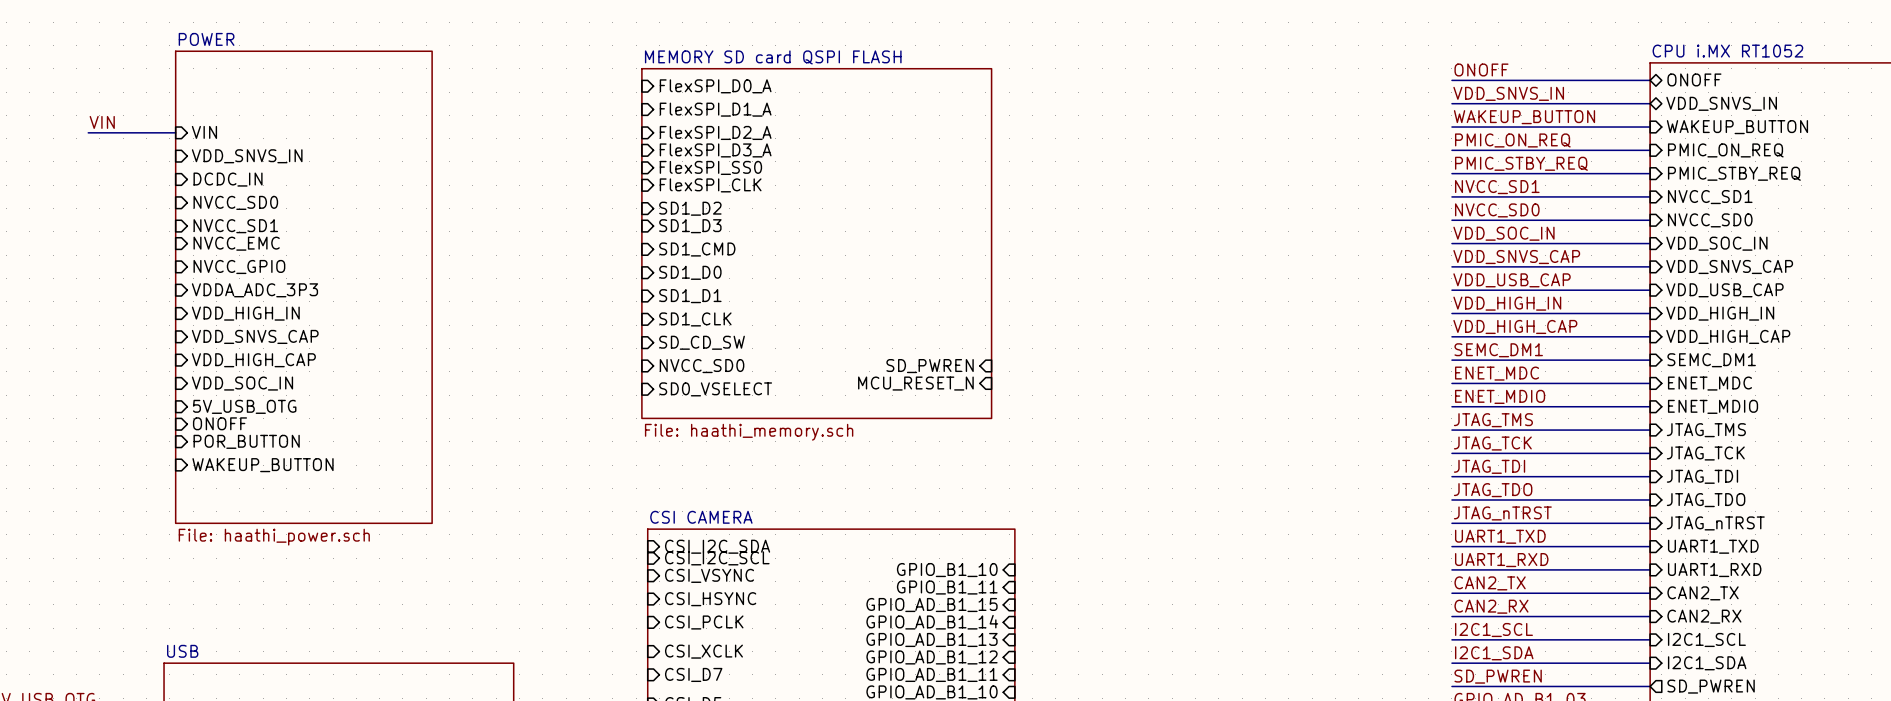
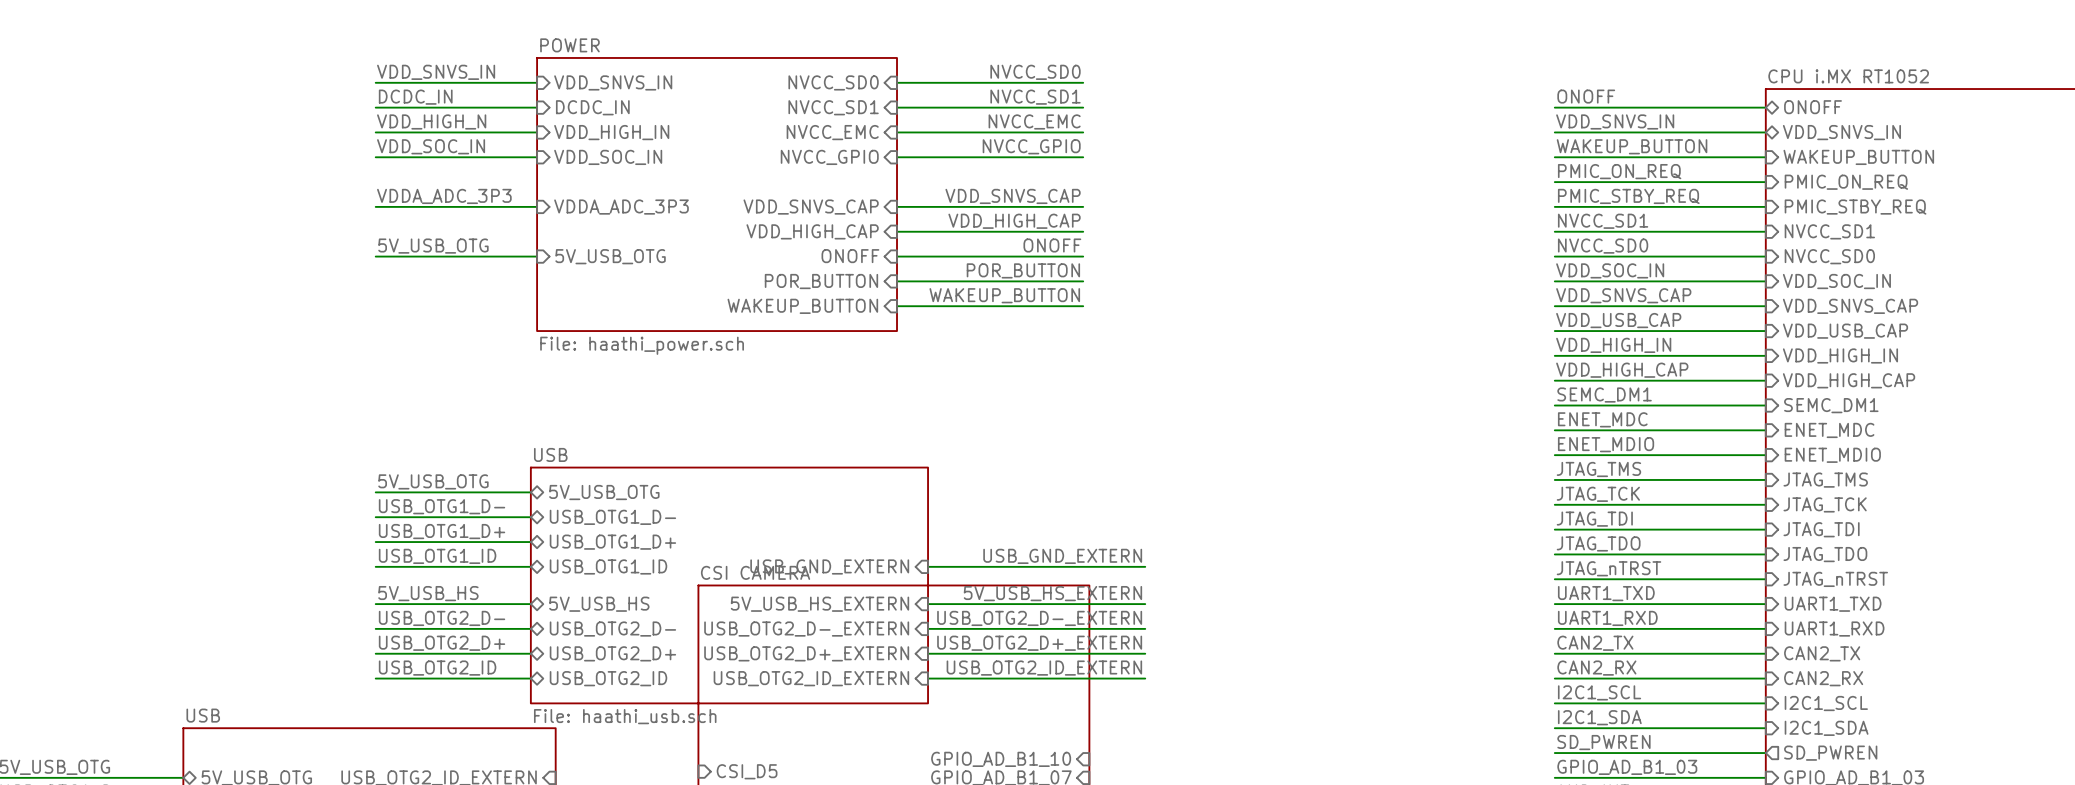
label: none -> VDD_SNVS_IN (436, 72)
label: none -> NVCC_SD0 (1035, 72)
wire: none -> (375, 82) (537, 82)
sheet pin: none -> VDD_SNVS_IN (613, 82)
sheet pin: none -> NVCC_SD0 (833, 82)
wire: none -> (897, 82) (1083, 82)
label: none -> DCDC_IN (415, 97)
label: none -> NVCC_SD1 (1035, 97)
wire: none -> (375, 107) (537, 107)
sheet pin: none -> DCDC_IN (592, 107)
sheet pin: none -> NVCC_SD1 (833, 107)
wire: none -> (897, 107) (1083, 107)
sheet pin: FlexSPI_D0_A (715, 86) -> none
label: none -> VDD_HIGH_N (431, 121)
label: none -> NVCC_EMC (1034, 121)
wire: none -> (375, 132) (537, 132)
sheet pin: none -> VDD_HIGH_IN (611, 132)
sheet pin: none -> NVCC_EMC (832, 132)
wire: none -> (897, 132) (1083, 132)
sheet pin: FlexSPI_D1_A (715, 109) -> none
label: none -> VDD_SOC_IN (431, 146)
label: none -> NVCC_GPIO (1031, 146)
label: VIN (102, 122) -> none
wire: none -> (375, 157) (537, 157)
sheet pin: none -> VDD_SOC_IN (608, 157)
sheet pin: none -> NVCC_GPIO (829, 157)
wire: none -> (897, 157) (1083, 157)
wire: (88, 132) (175, 132) -> none
sheet pin: VIN (204, 132) -> none
sheet pin: FlexSPI_D2_A (715, 132) -> none
sheet pin: FlexSPI_D3_A (715, 150) -> none
sheet pin: VDD_SNVS_IN (247, 156) -> none
sheet POWER: none -> File: haathi_power.sch (717, 194)
label: none -> VDDA_ADC_3P3 (444, 196)
label: none -> VDD_SNVS_CAP (1013, 196)
sheet pin: FlexSPI_SS0 (710, 167) -> none
wire: none -> (375, 206) (537, 206)
sheet pin: none -> VDDA_ADC_3P3 (621, 207)
sheet pin: none -> VDD_SNVS_CAP (811, 207)
wire: none -> (897, 206) (1083, 206)
sheet pin: DCDC_IN (228, 179) -> none
sheet pin: FlexSPI_CLK (710, 185) -> none
label: none -> VDD_HIGH_CAP (1014, 221)
wire: none -> (897, 231) (1083, 231)
sheet pin: none -> VDD_HIGH_CAP (812, 231)
sheet pin: NVCC_SD0 (235, 202) -> none
sheet pin: SD1_D2 (690, 208) -> none
label: none -> ONOFF (1052, 245)
label: none -> 5V_USB_OTG (433, 246)
sheet pin: none -> ONOFF (850, 256)
wire: none -> (375, 256) (537, 256)
sheet pin: none -> 5V_USB_OTG (610, 256)
wire: none -> (897, 256) (1083, 256)
sheet pin: NVCC_SD1 (235, 226) -> none
sheet pin: SD1_D3 (690, 226) -> none
label: none -> POR_BUTTON (1023, 270)
sheet pin: NVCC_EMC (236, 243) -> none
sheet pin: none -> POR_BUTTON (821, 281)
sheet MEMORY SD card QSPI FLASH: File: haathi_memory.sch (816, 243) -> none
wire: none -> (897, 281) (1083, 281)
sheet pin: SD1_CMD (697, 249) -> none
label: none -> WAKEUP_BUTTON (1004, 295)
wire: none -> (897, 306) (1083, 306)
sheet pin: NVCC_GPIO (239, 267) -> none
sheet pin: none -> WAKEUP_BUTTON (802, 306)
sheet pin: SD1_D0 (690, 272) -> none
sheet POWER: File: haathi_power.sch (303, 287) -> none
sheet pin: VDDA_ADC_3P3 (254, 290) -> none
sheet pin: SD1_D1 (690, 296) -> none
sheet pin: VDD_HIGH_IN (245, 313) -> none
sheet pin: SD1_CLK (695, 319) -> none
sheet pin: VDD_SNVS_CAP (255, 336) -> none
sheet pin: SD_CD_SW (702, 342) -> none
sheet pin: VDD_HIGH_CAP (253, 360) -> none
sheet pin: NVCC_SD0 (702, 366) -> none
sheet pin: SD_PWREN (930, 366) -> none
sheet pin: VDD_SOC_IN (242, 383) -> none
sheet pin: MCU_RESET_N (915, 383) -> none
sheet pin: SD0_VSELECT (715, 389) -> none
sheet pin: 5V_USB_OTG (244, 406) -> none
sheet pin: ONOFF (219, 423) -> none
label: none -> 5V_USB_OTG (433, 481)
sheet pin: POR_BUTTON (246, 441) -> none
wire: none -> (375, 492) (530, 492)
sheet pin: none -> 5V_USB_OTG (604, 492)
label: none -> USB_OTG1_D- (442, 506)
sheet pin: WAKEUP_BUTTON (263, 465) -> none
wire: none -> (375, 517) (530, 517)
sheet pin: none -> USB_OTG1_D- (612, 517)
label: none -> USB_OTG1_D+ (442, 531)
wire: none -> (375, 542) (530, 542)
sheet pin: none -> USB_OTG1_D+ (612, 542)
label: none -> USB_OTG1_ID (437, 556)
label: none -> USB_GND_EXTERN (1062, 556)
wire: none -> (375, 566) (530, 566)
sheet pin: none -> USB_OTG1_ID (608, 566)
sheet pin: none -> USB_GND_EXTERN (829, 566)
wire: none -> (928, 566) (1145, 566)
sheet USB: none -> File: haathi_usb.sch (729, 585)
label: none -> 5V_USB_HS (428, 593)
label: none -> 5V_USB_HS_EXTERN (1052, 593)
wire: none -> (375, 604) (530, 604)
sheet pin: none -> 5V_USB_HS (599, 604)
sheet pin: CSI_I2C_SDA (717, 546) -> none
sheet pin: none -> 5V_USB_HS_EXTERN (819, 604)
wire: none -> (928, 604) (1145, 604)
sheet pin: CSI_I2C_SCL (717, 558) -> none
label: none -> USB_OTG2_D- (442, 618)
label: none -> USB_OTG2_D-_EXTERN (1039, 618)
wire: none -> (375, 628) (530, 628)
wire: none -> (928, 628) (1145, 628)
sheet pin: none -> USB_OTG2_D- (612, 629)
sheet pin: none -> USB_OTG2_D-_EXTERN (806, 629)
sheet pin: GPIO_B1_10 (947, 570) -> none
sheet pin: CSI_VSYNC (709, 575) -> none
label: none -> USB_OTG2_D+ (442, 643)
label: none -> USB_OTG2_D+_EXTERN (1039, 643)
sheet pin: GPIO_B1_11 (947, 587) -> none
wire: none -> (375, 653) (530, 653)
sheet pin: none -> USB_OTG2_D+ (612, 653)
sheet pin: none -> USB_OTG2_D+_EXTERN (806, 653)
wire: none -> (928, 653) (1145, 653)
sheet pin: CSI_HSYNC (710, 599) -> none
sheet pin: GPIO_AD_B1_15 (932, 605) -> none
label: none -> USB_OTG2_ID (437, 668)
label: none -> USB_OTG2_ID_EXTERN (1044, 668)
wire: none -> (375, 678) (530, 678)
sheet pin: none -> USB_OTG2_ID (608, 678)
sheet pin: none -> USB_OTG2_ID_EXTERN (811, 678)
wire: none -> (928, 678) (1145, 678)
sheet pin: CSI_PCLK (704, 622) -> none
sheet pin: GPIO_AD_B1_14 (932, 622) -> none
sheet pin: GPIO_AD_B1_13 (932, 639) -> none
sheet pin: CSI_XCLK (703, 651) -> none
sheet pin: GPIO_AD_B1_12 (932, 657) -> none
sheet pin: CSI_D7 (693, 674) -> none
sheet pin: GPIO_AD_B1_11 (932, 674) -> none

